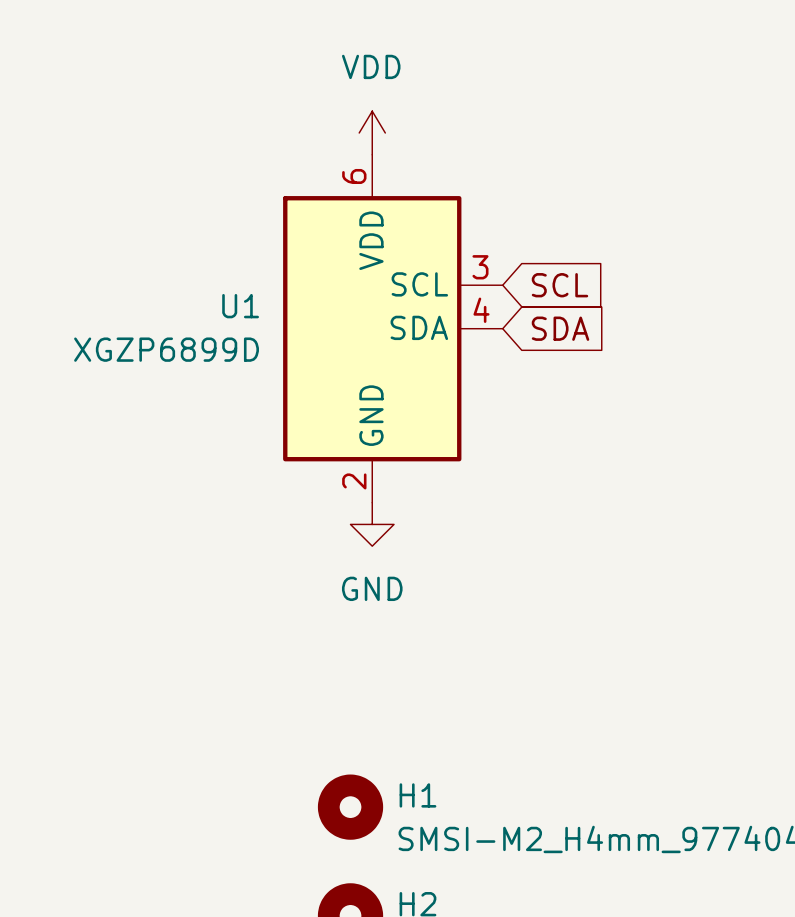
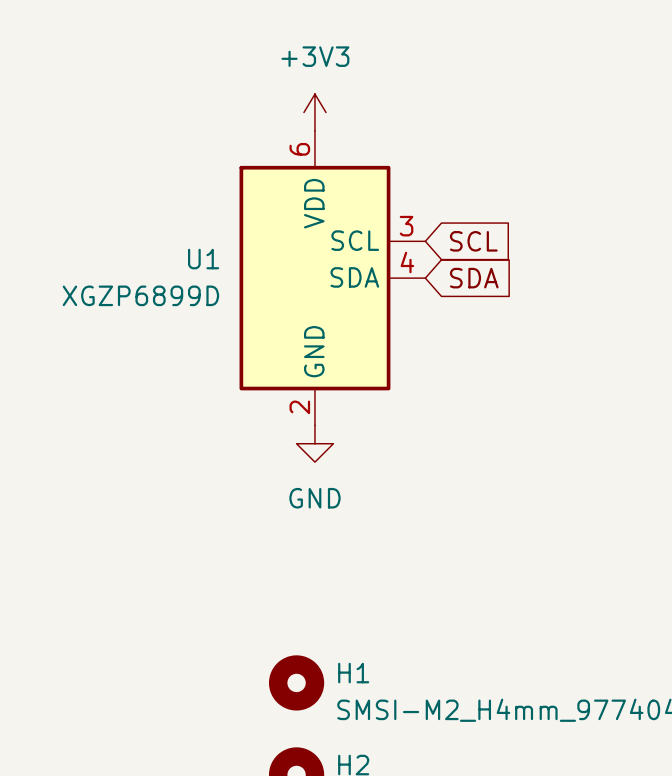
power symbol: VDD (372, 132) -> +3V3 (314, 112)

